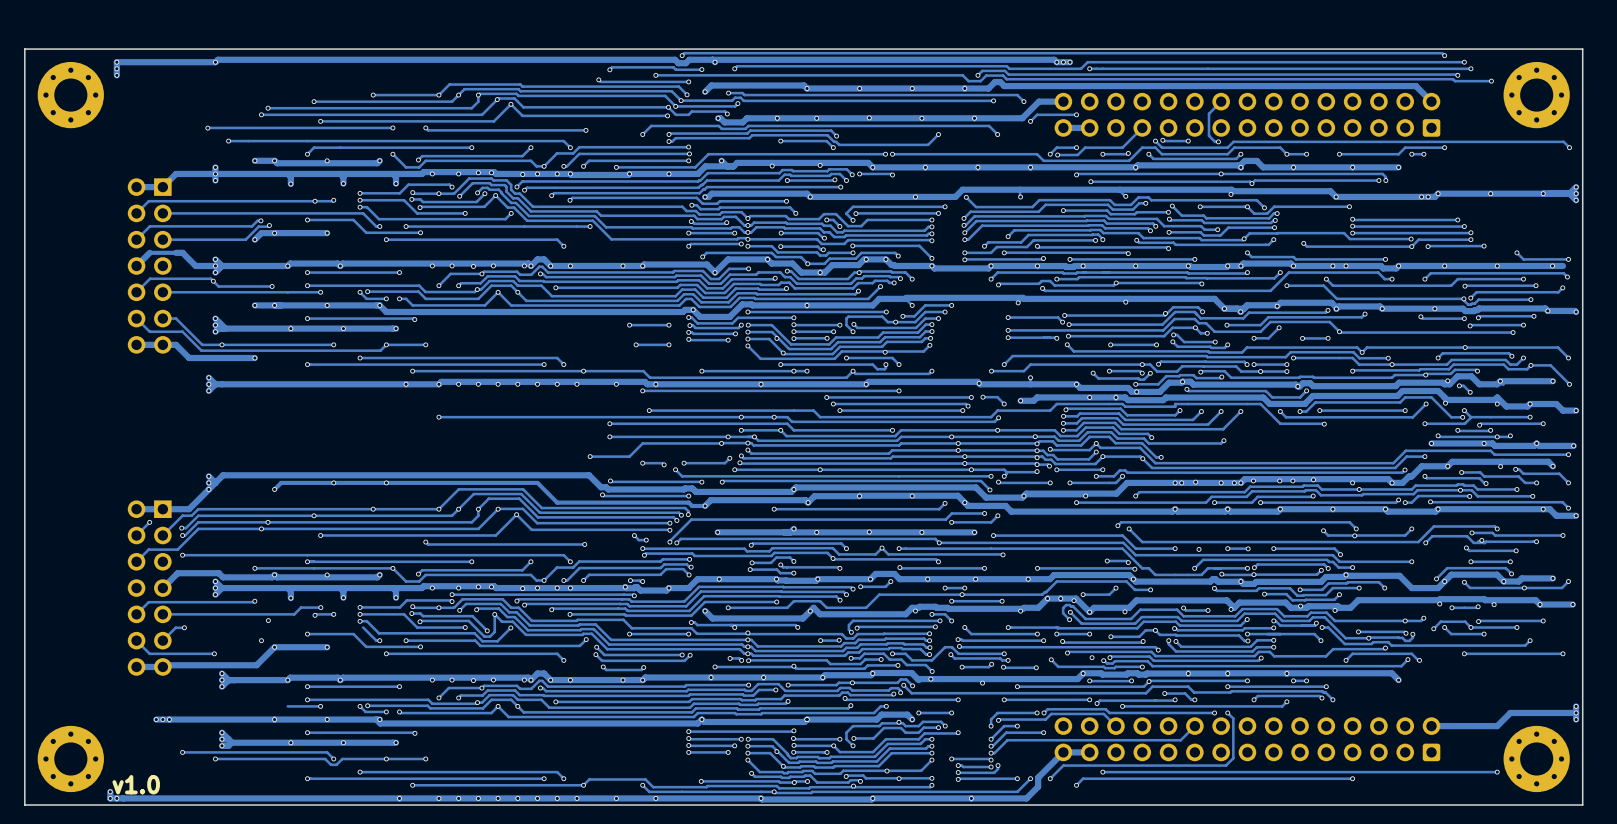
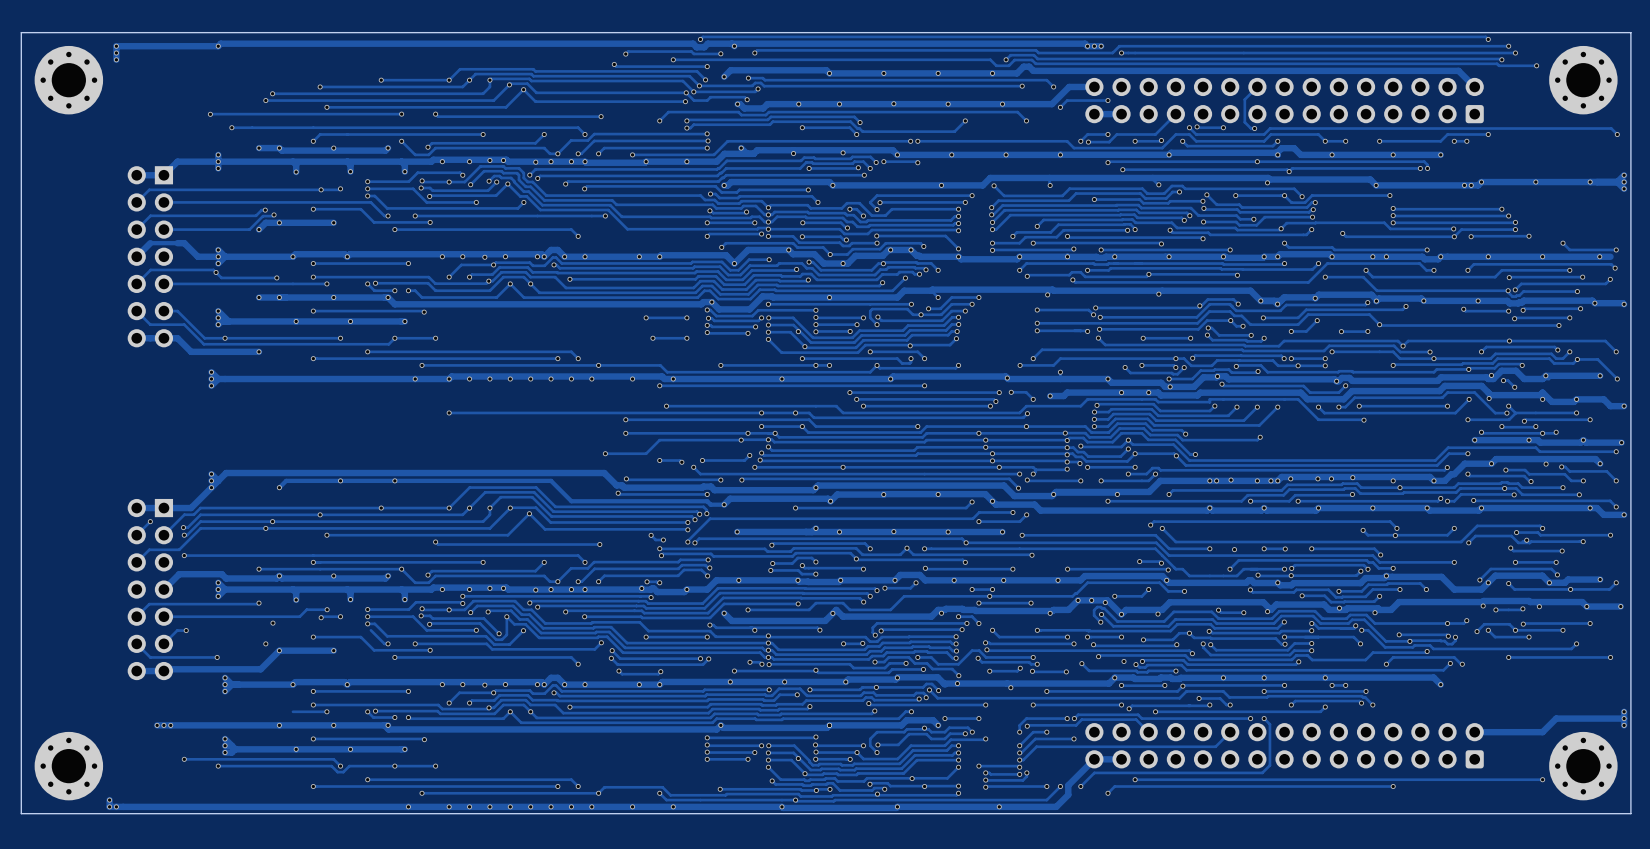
text: v1.0 (136, 784) -> none

